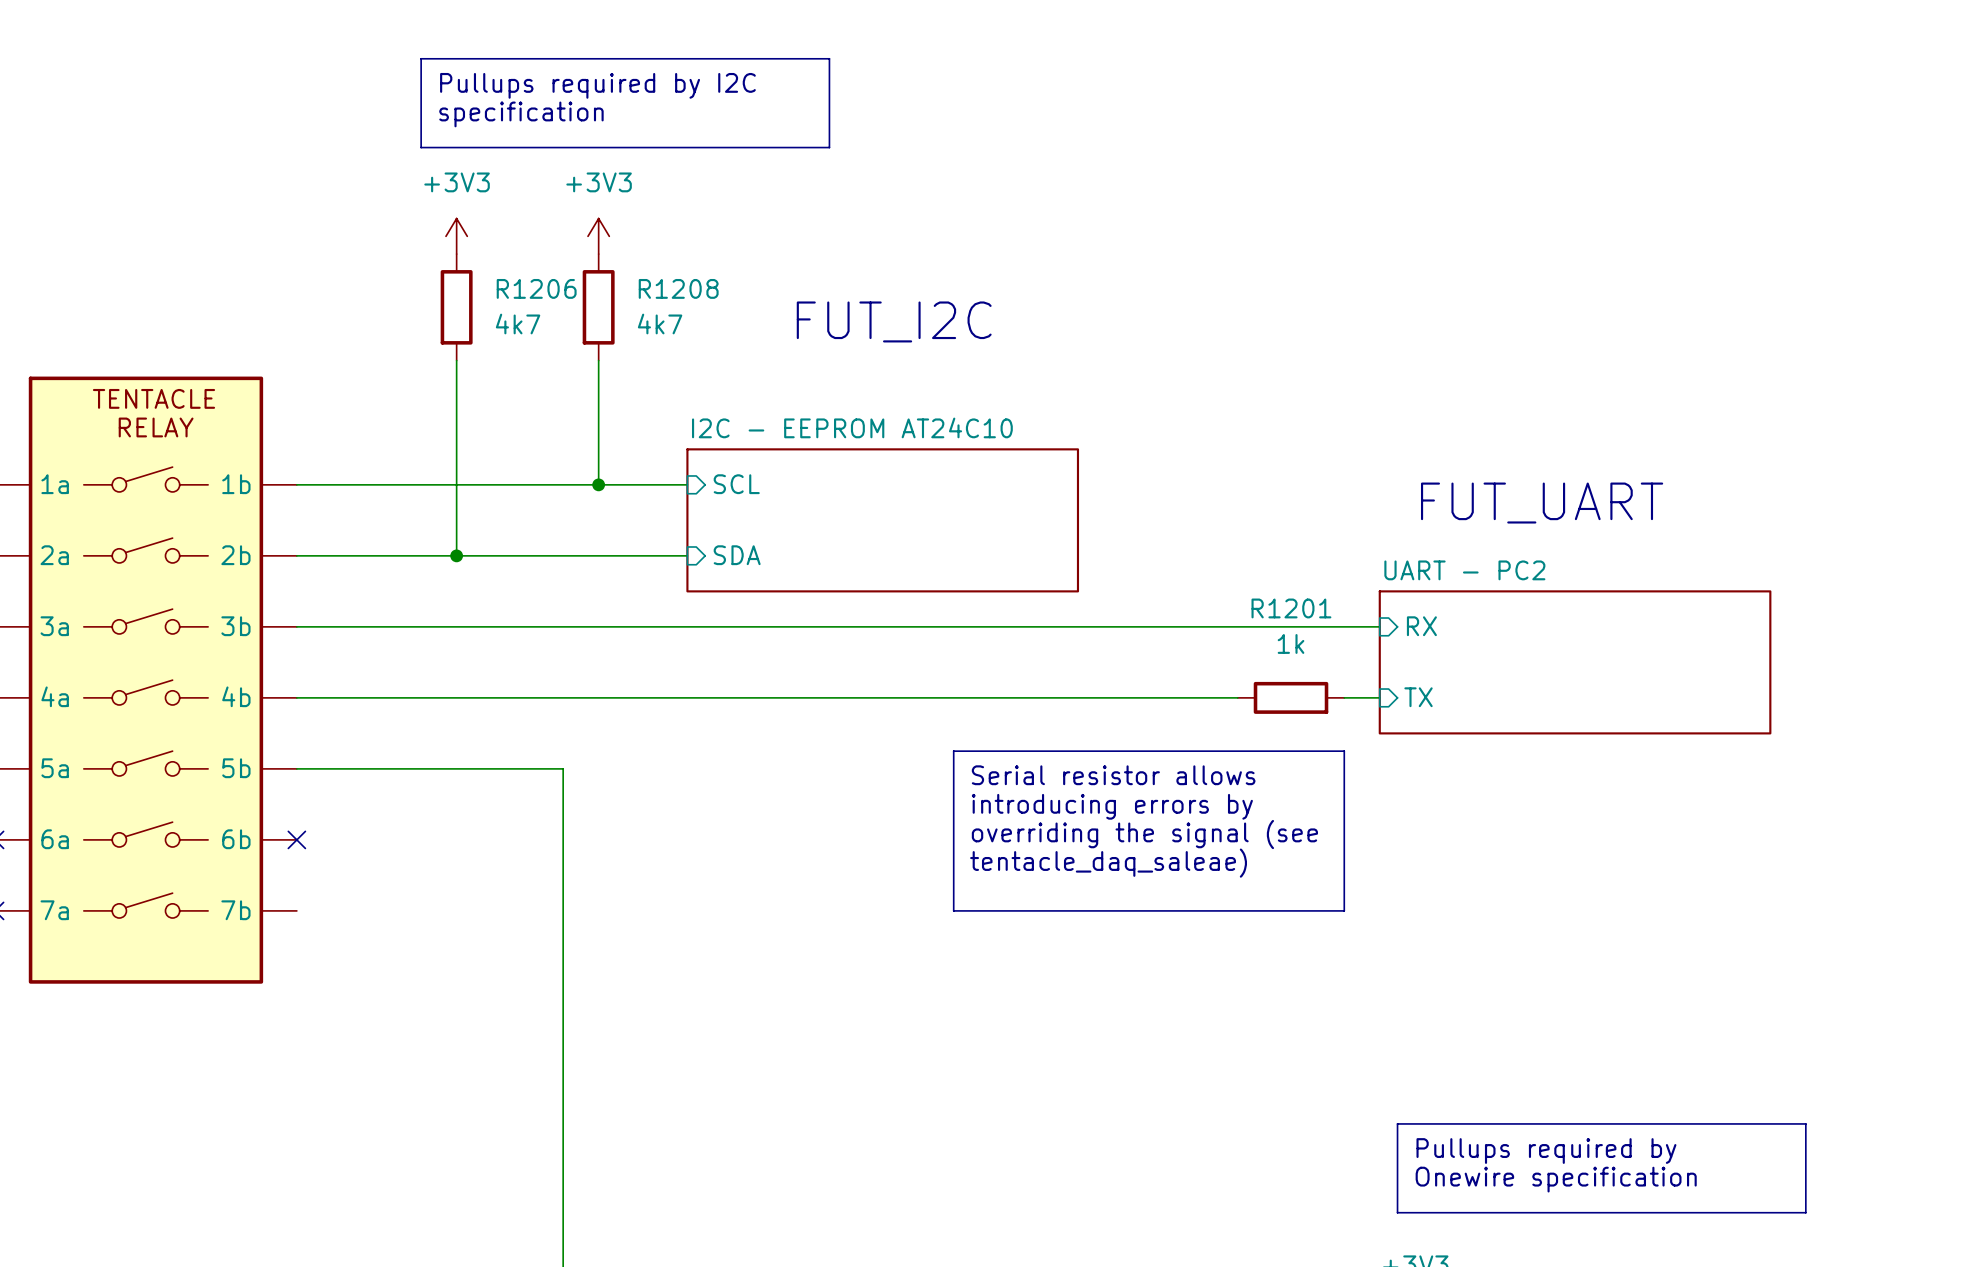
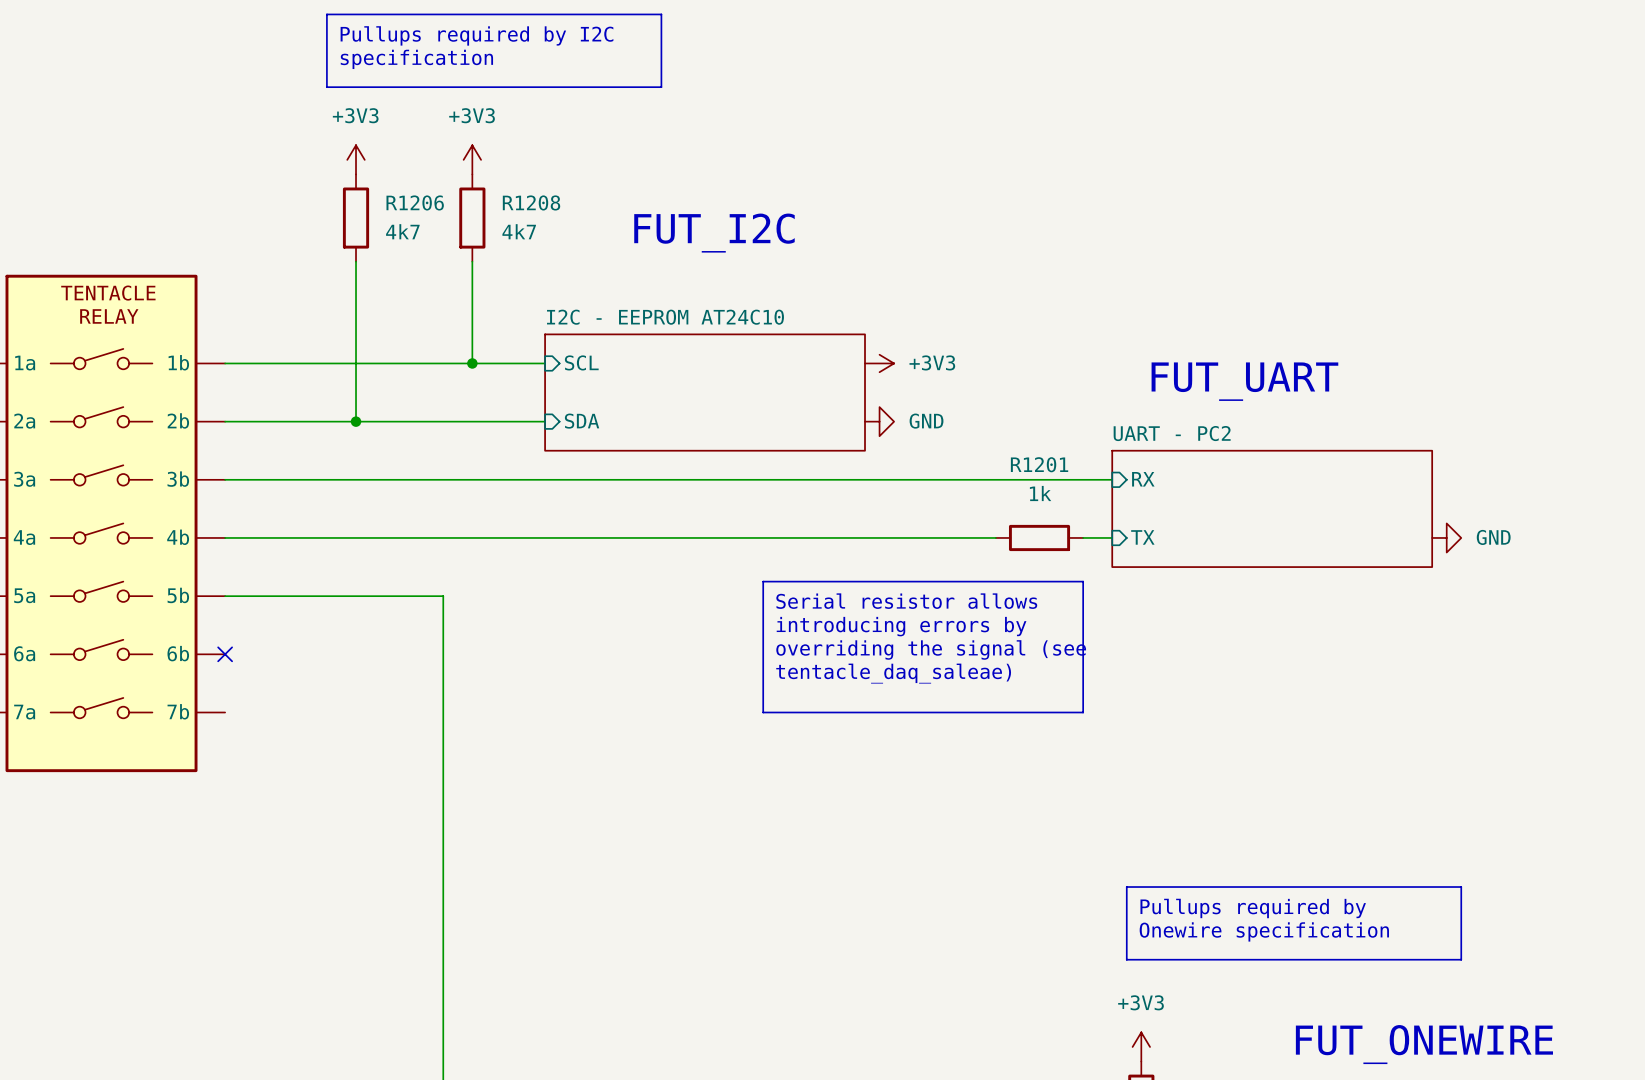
power symbol: none -> +3V3 (879, 363)
power symbol: none -> GND (879, 421)
power symbol: none -> GND (1446, 537)

